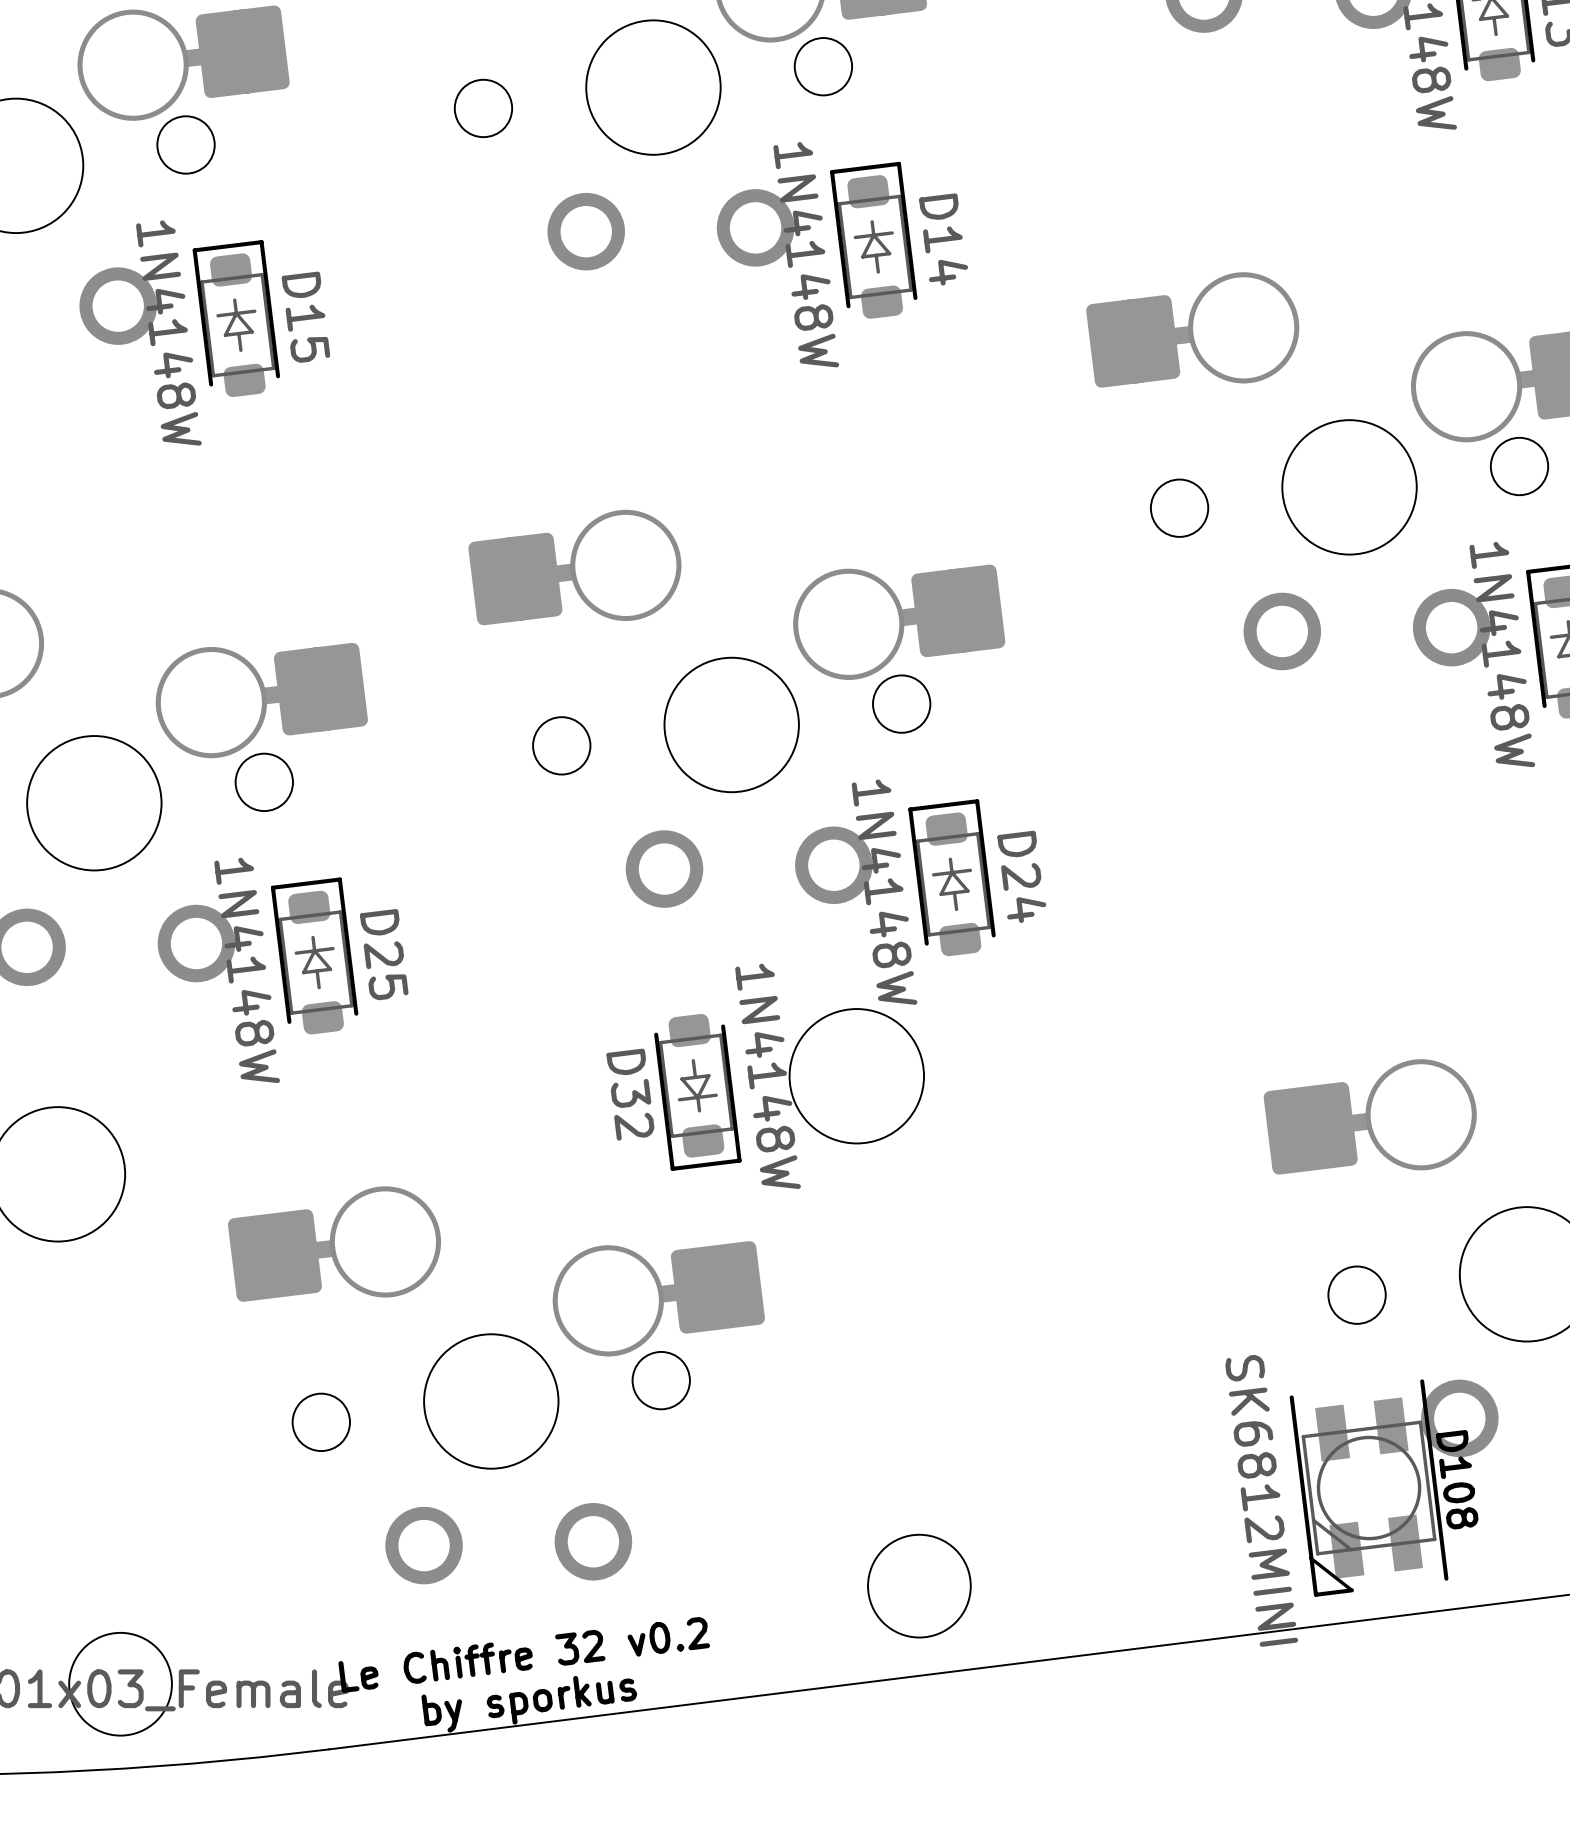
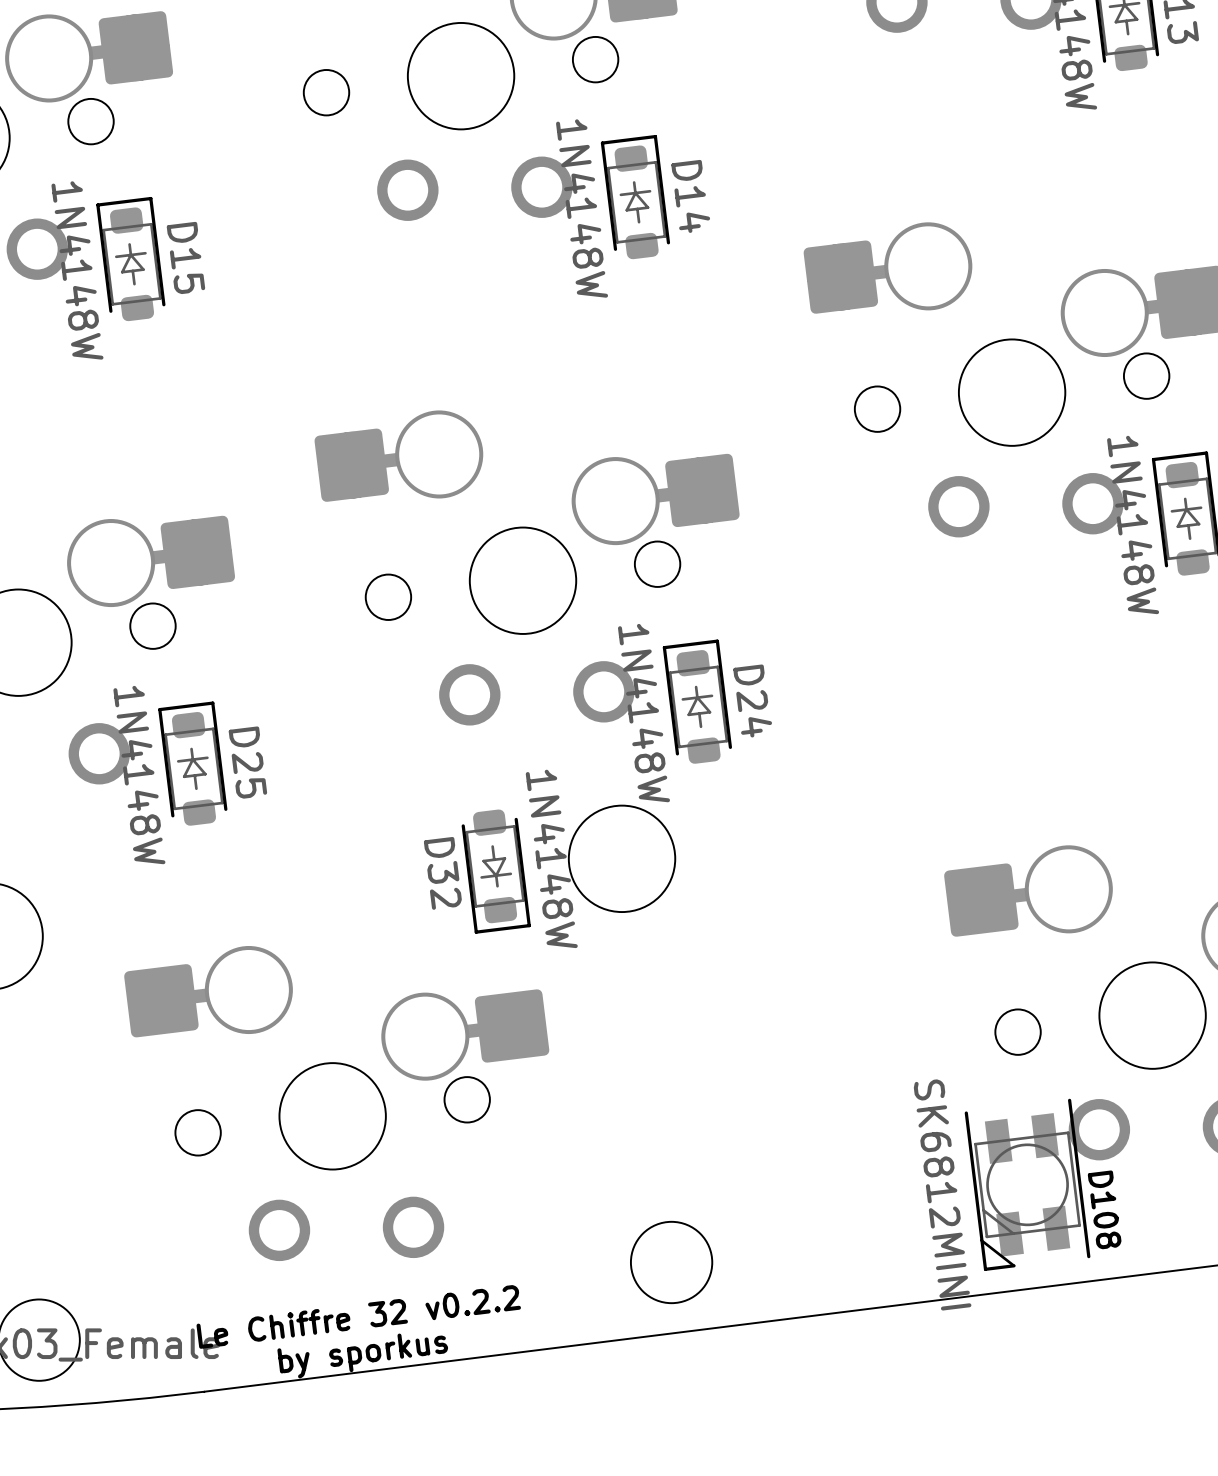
D108 name position: D108 (1457, 1479) -> D108 (1104, 1209)
text: Le Chiffre 32 v0.2 (524, 1654) -> Le Chiffre 32 v0.2.2 (358, 1316)

